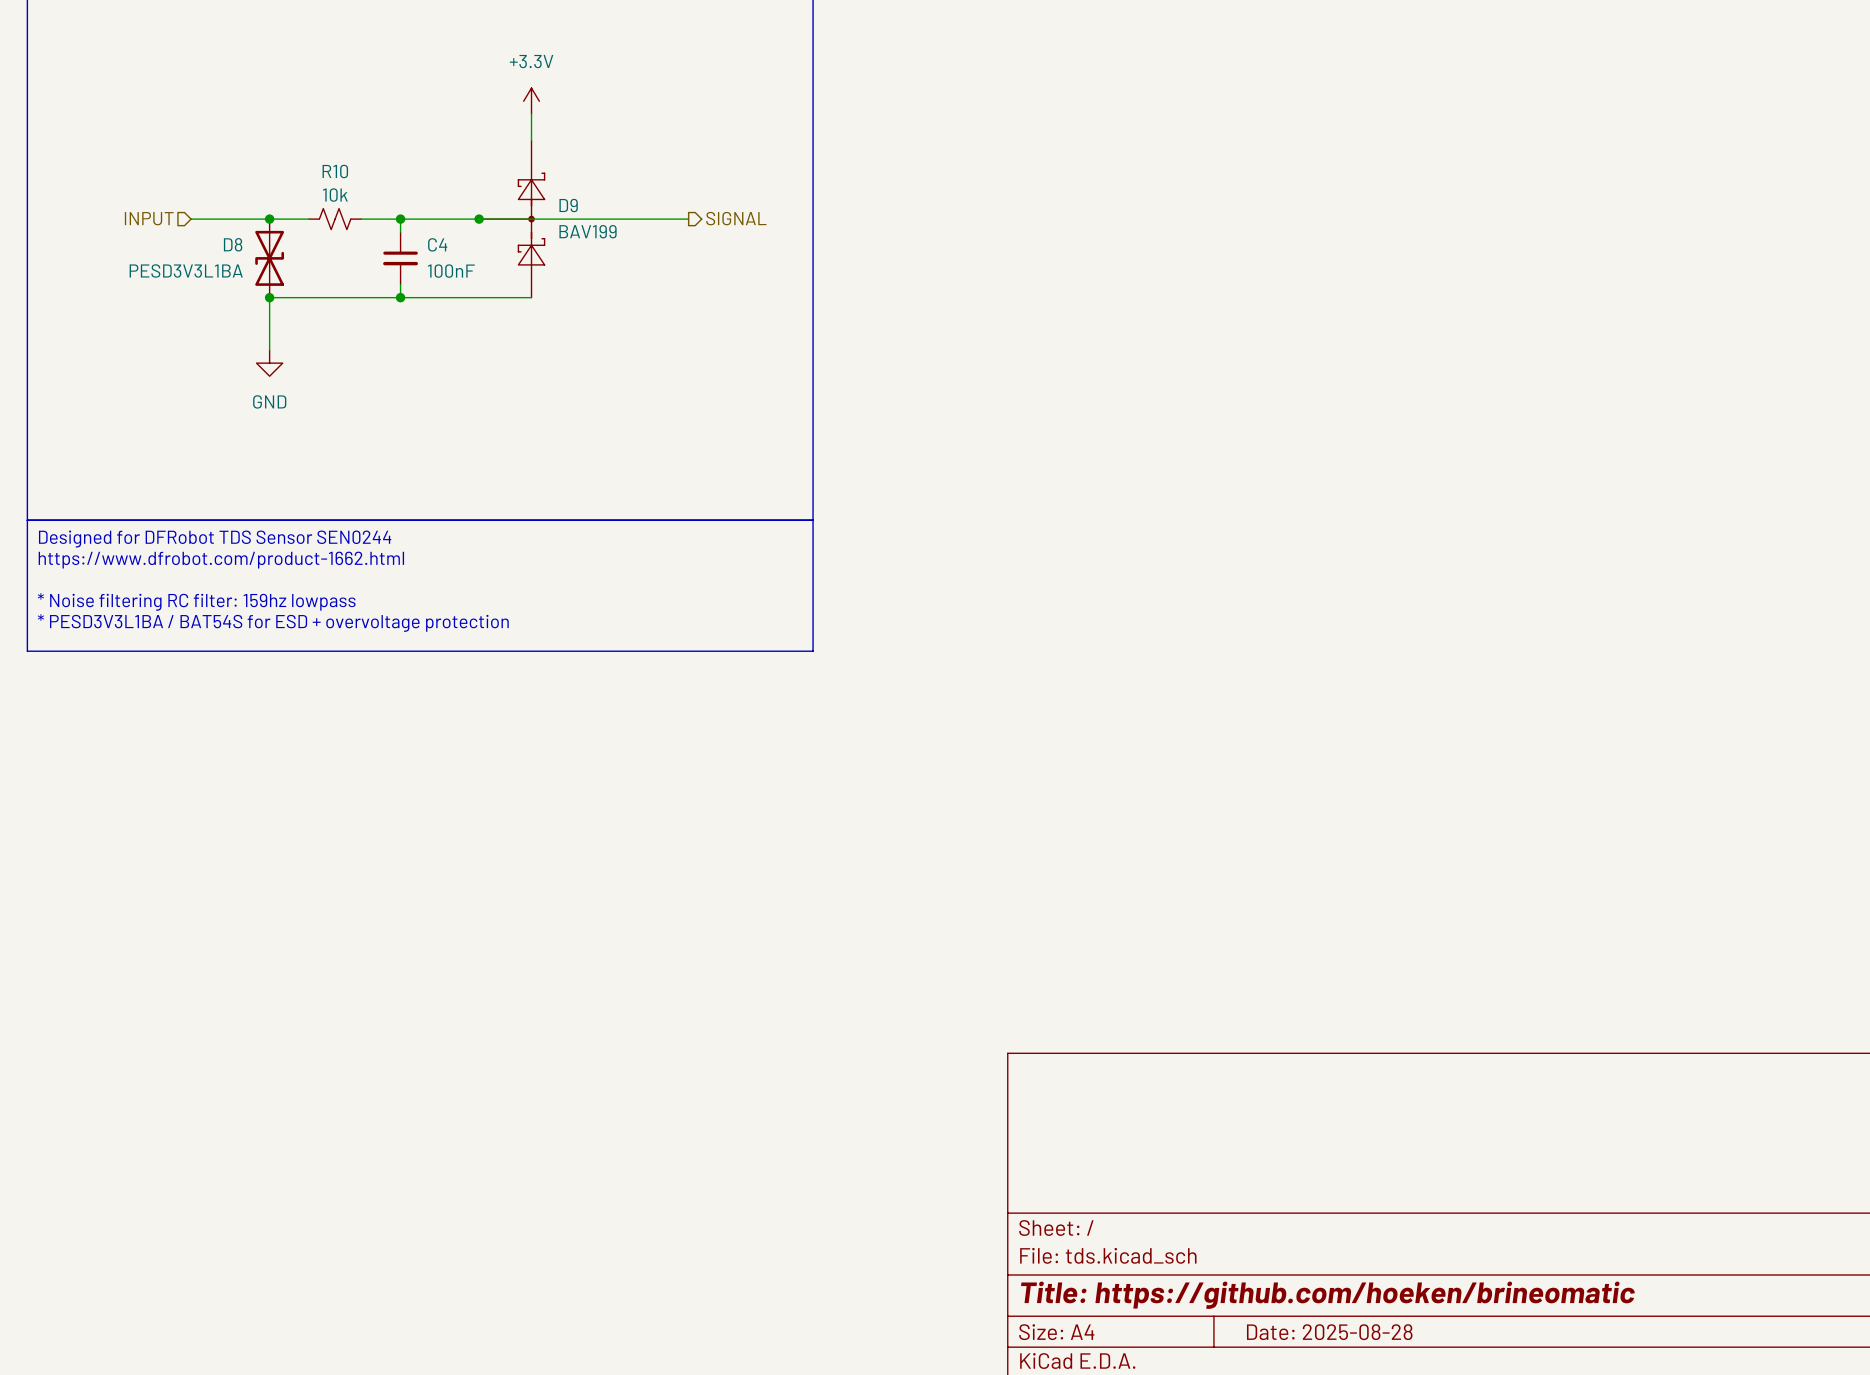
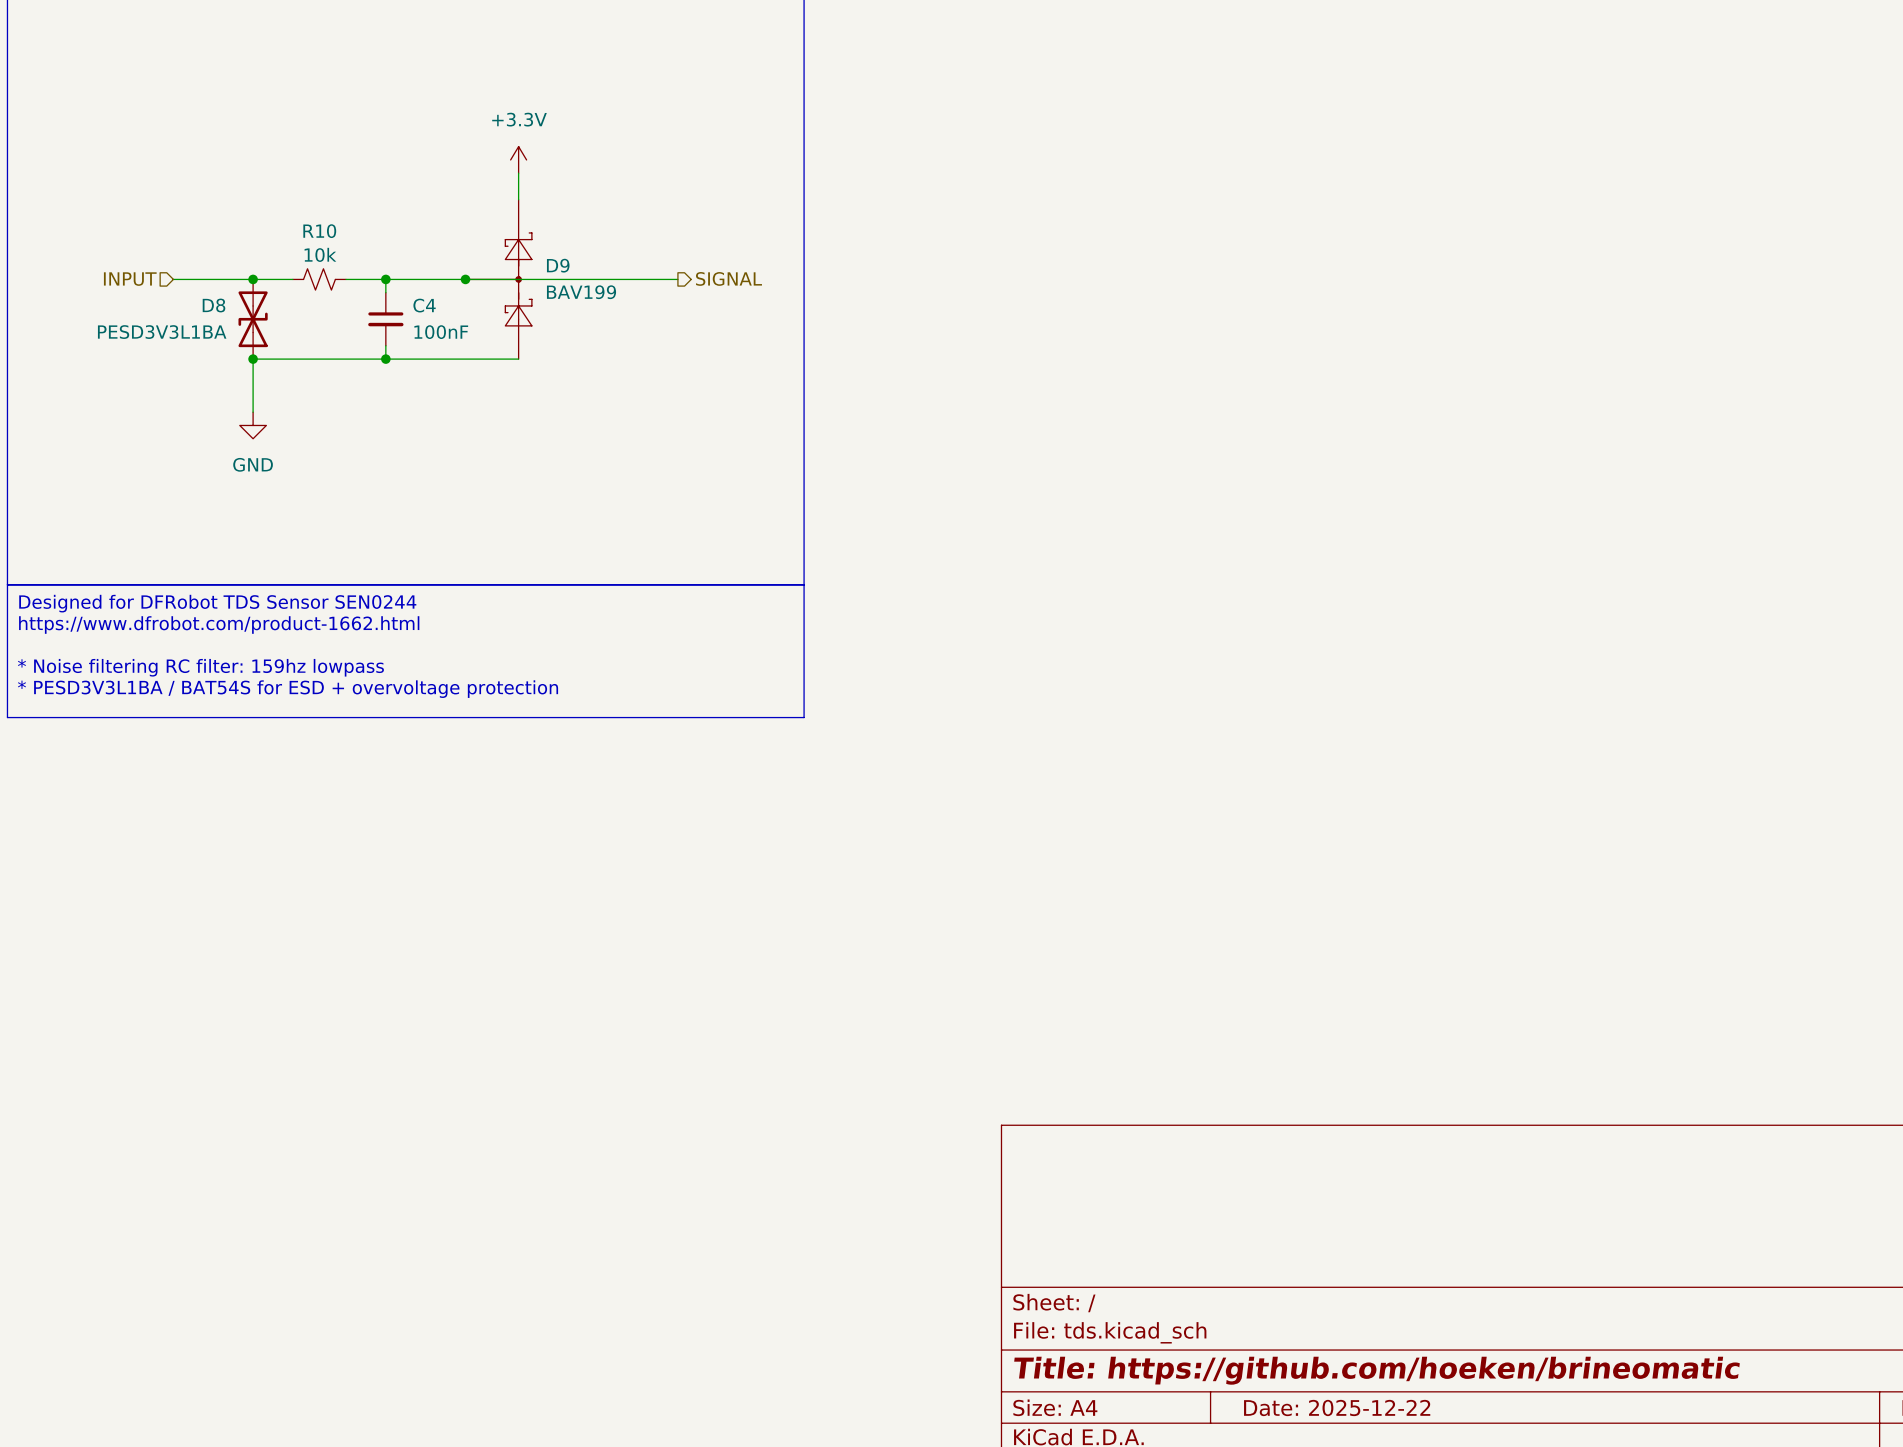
title block: Date: 2025-08-28 (1329, 1332) -> Date: 2025-12-22 (1337, 1407)

